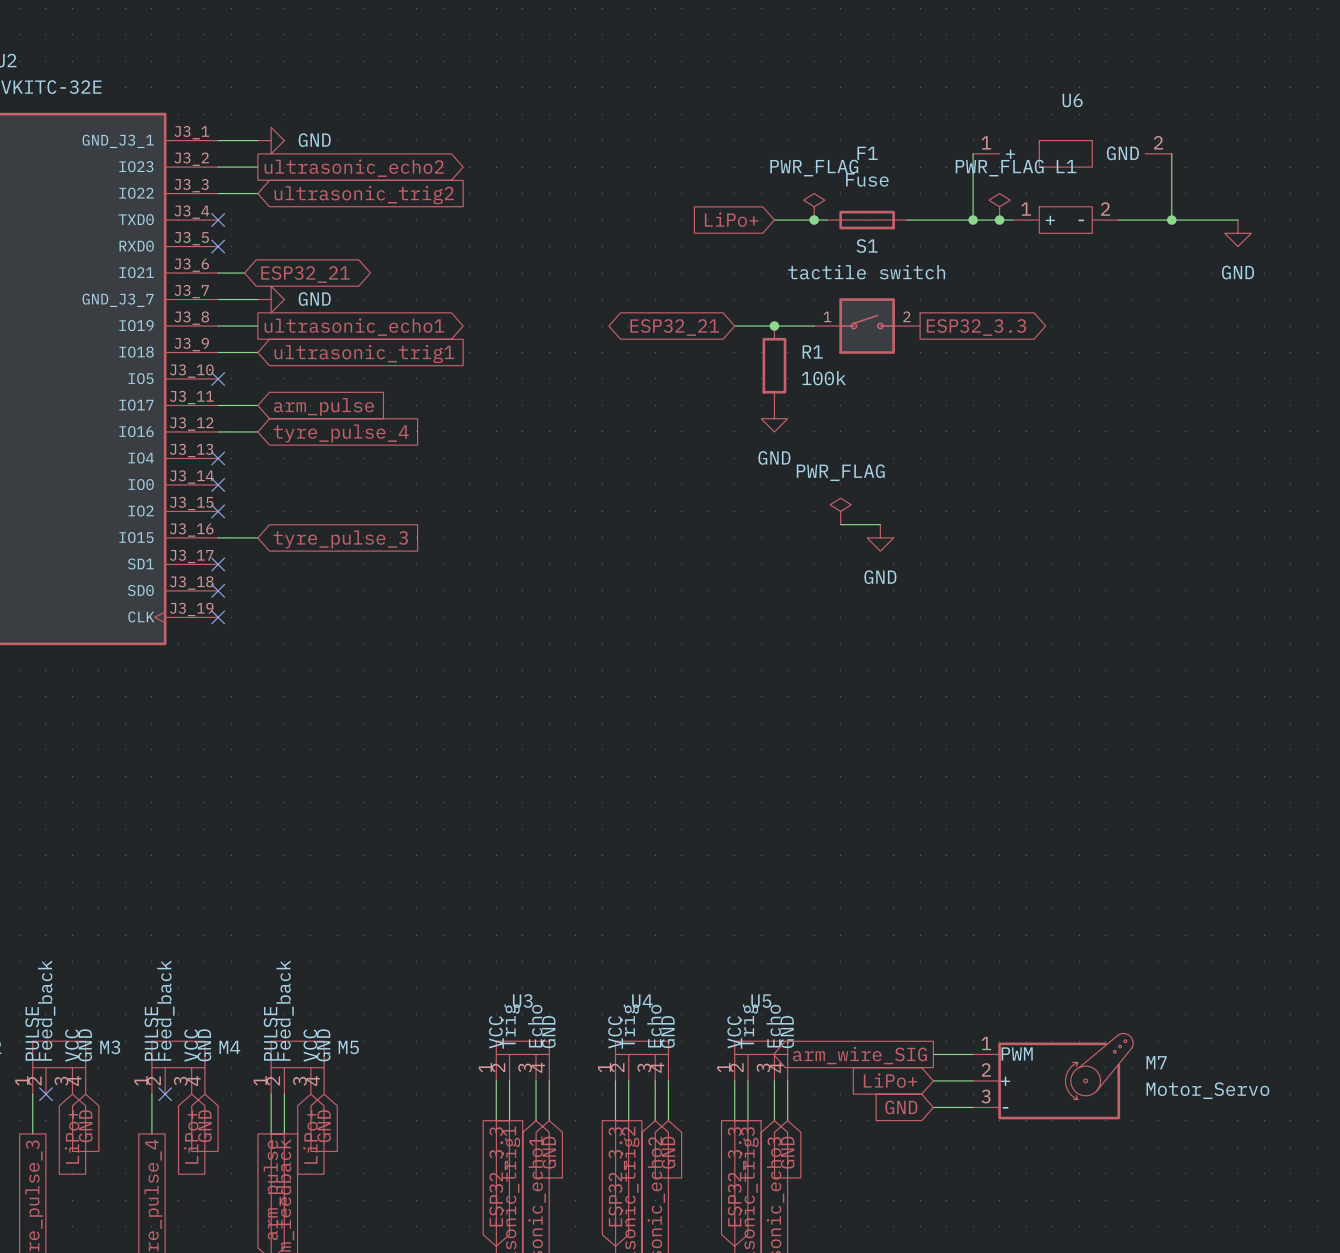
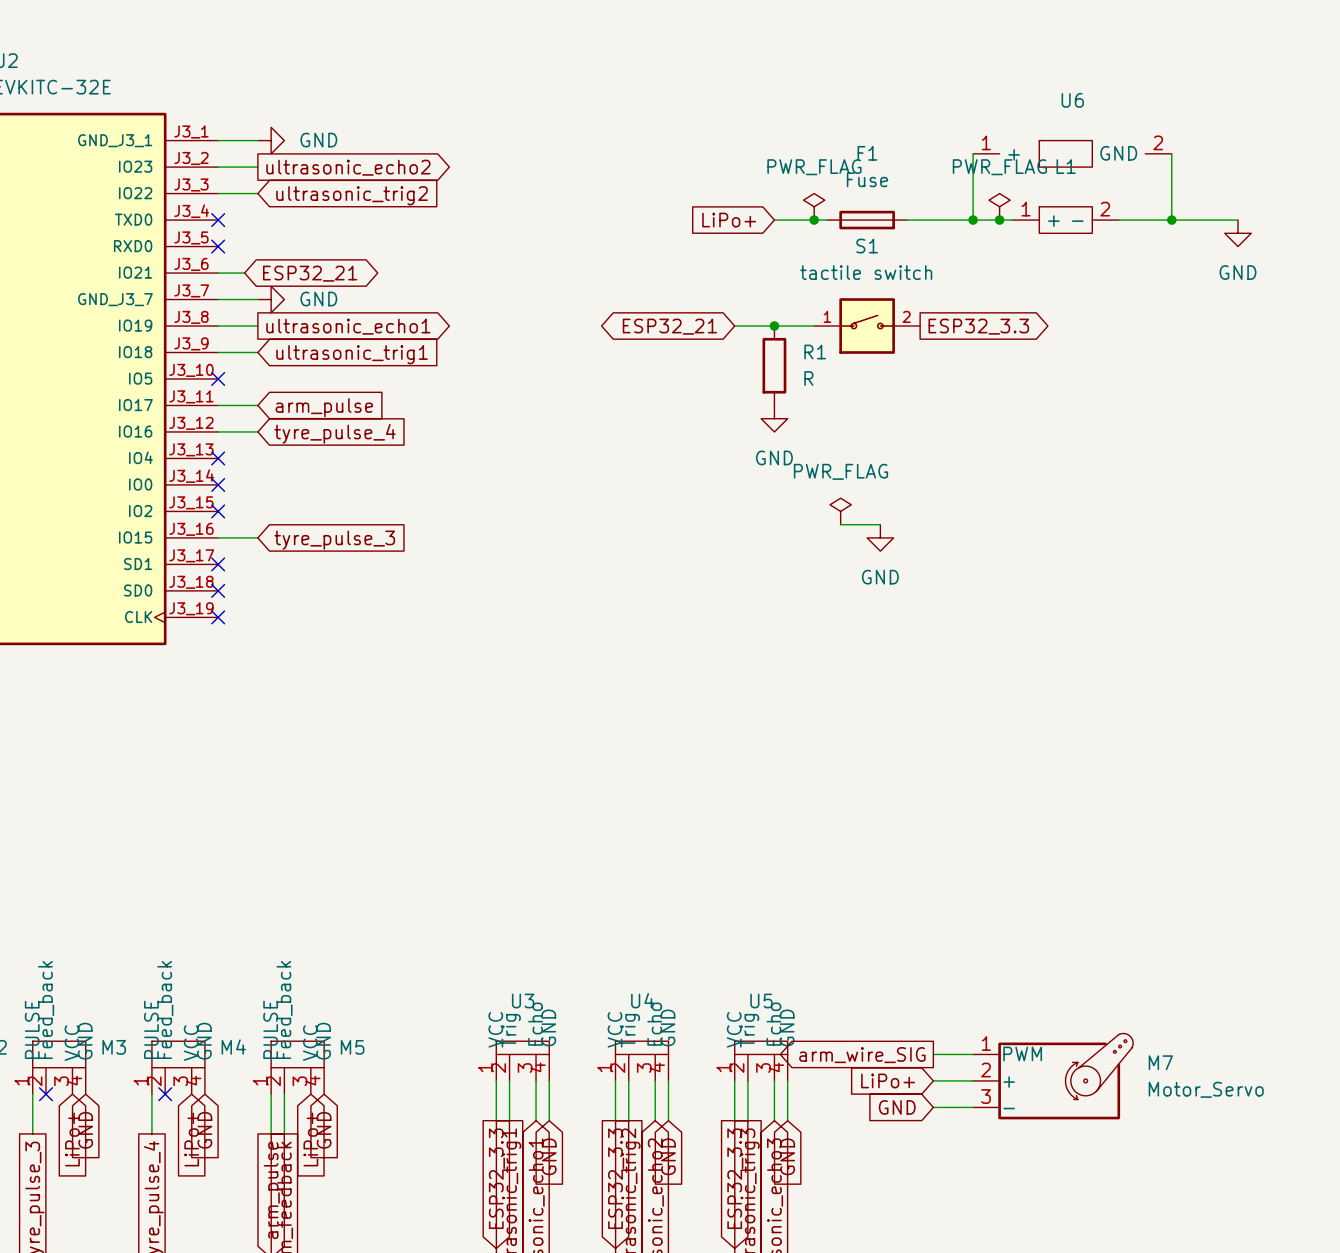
R1 value: 100k (823, 378) -> R (808, 378)

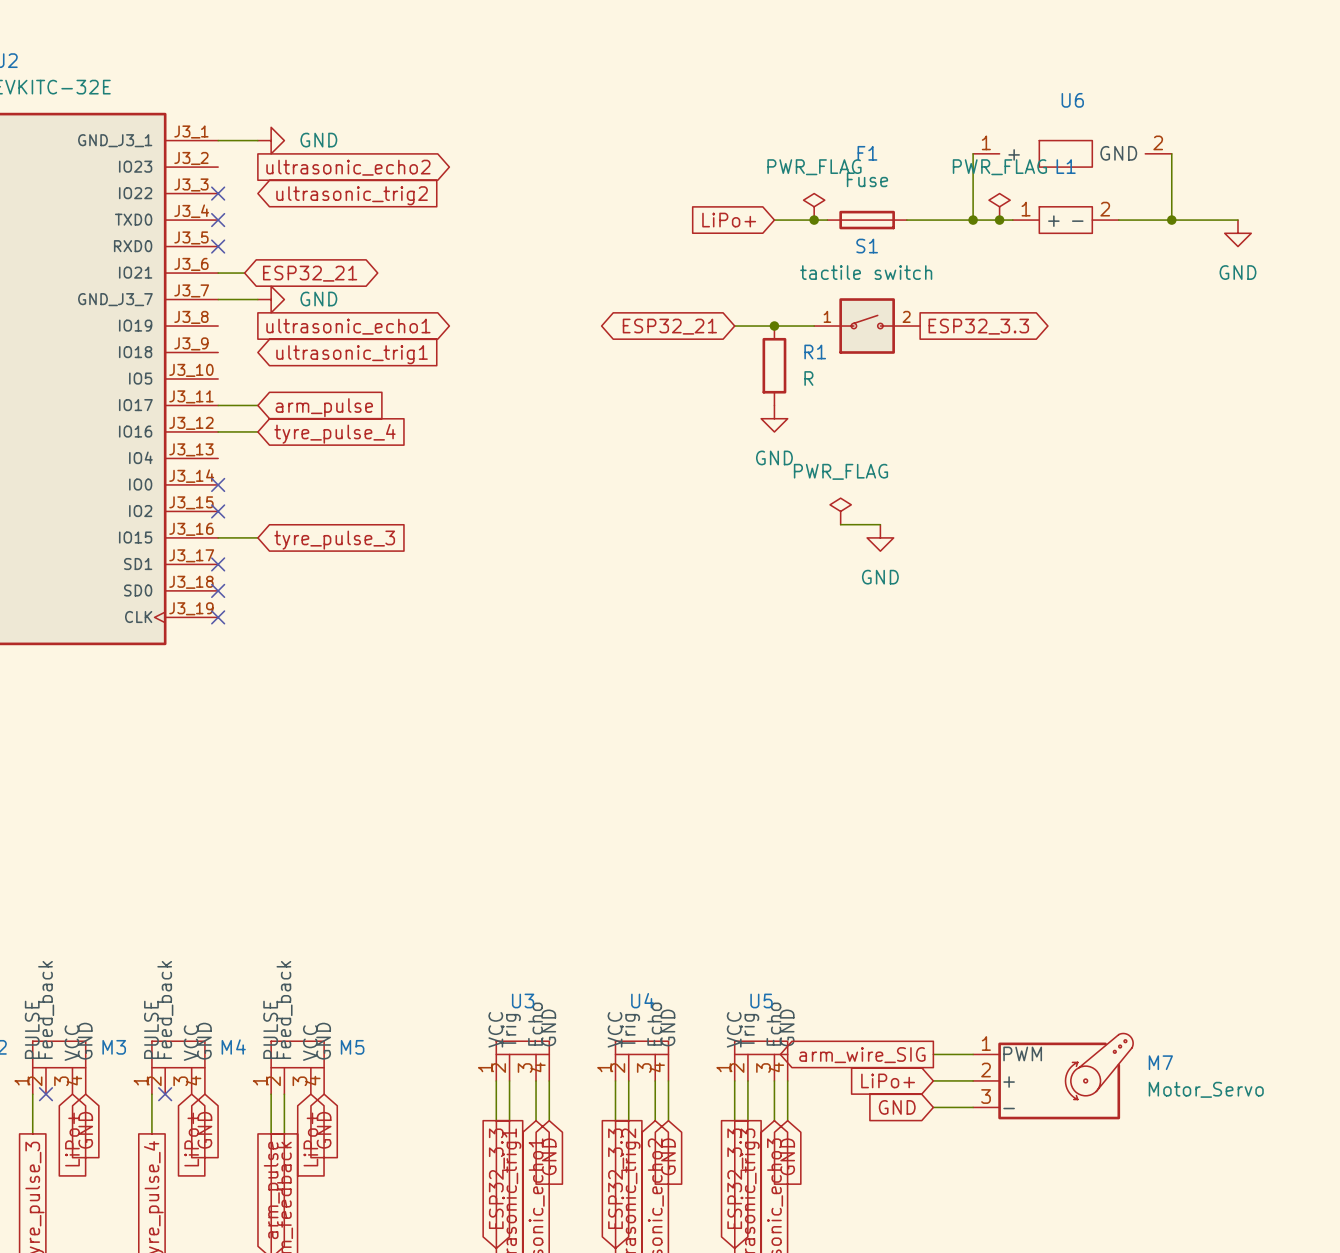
wire: (218, 167) (257, 167) -> none
wire: (218, 193) (257, 193) -> none
no-connect mark: none -> (218, 193)
wire: (218, 326) (257, 326) -> none
wire: (218, 352) (257, 352) -> none
no-connect mark: (218, 378) -> none
no-connect mark: (218, 458) -> none

